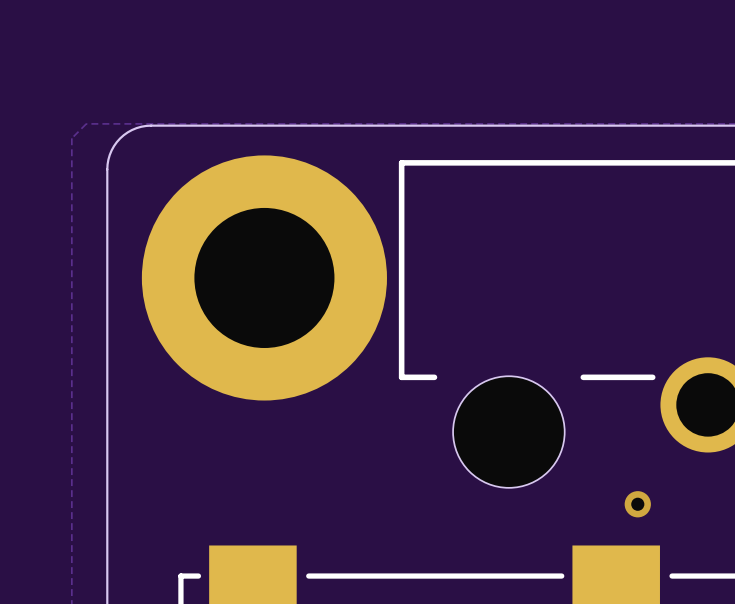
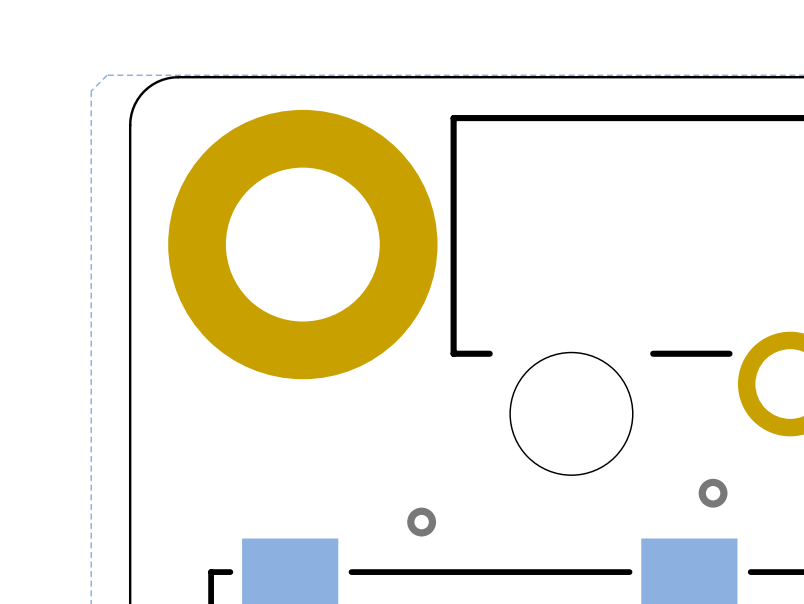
via: none -> (421, 522)

